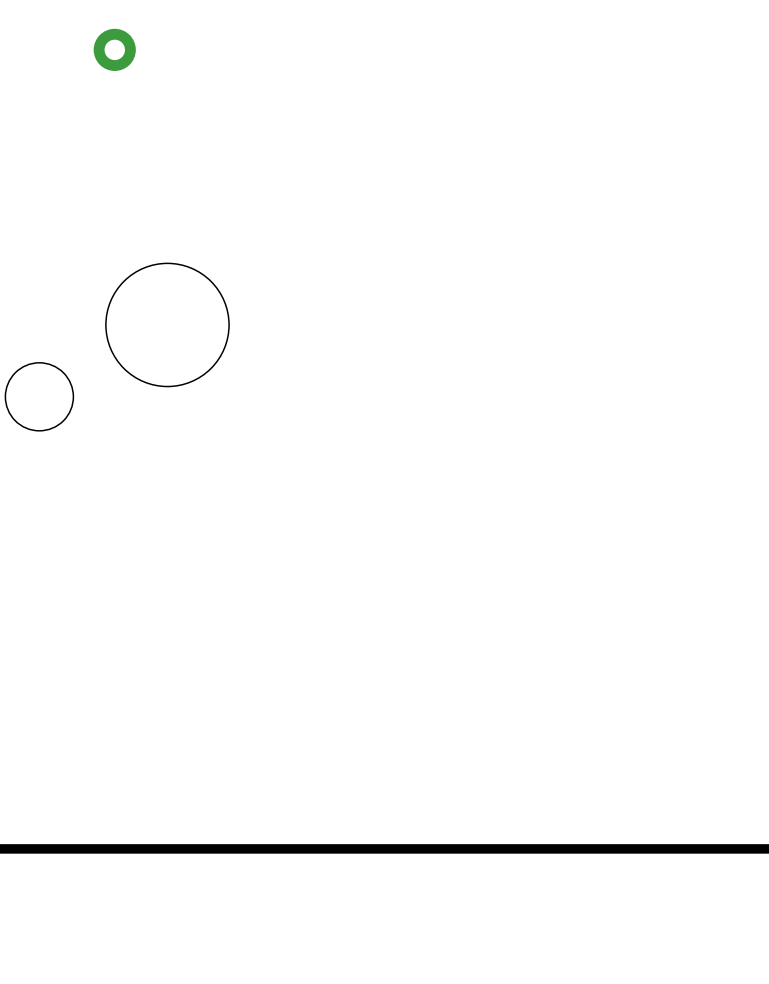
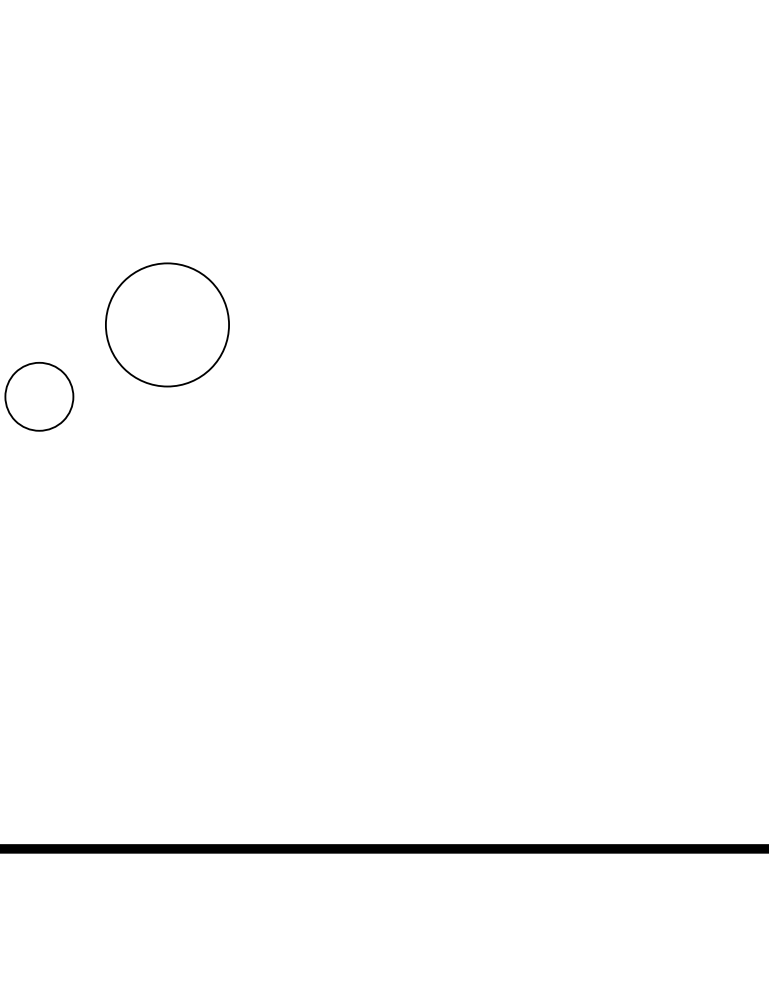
via: (114, 49) -> none

